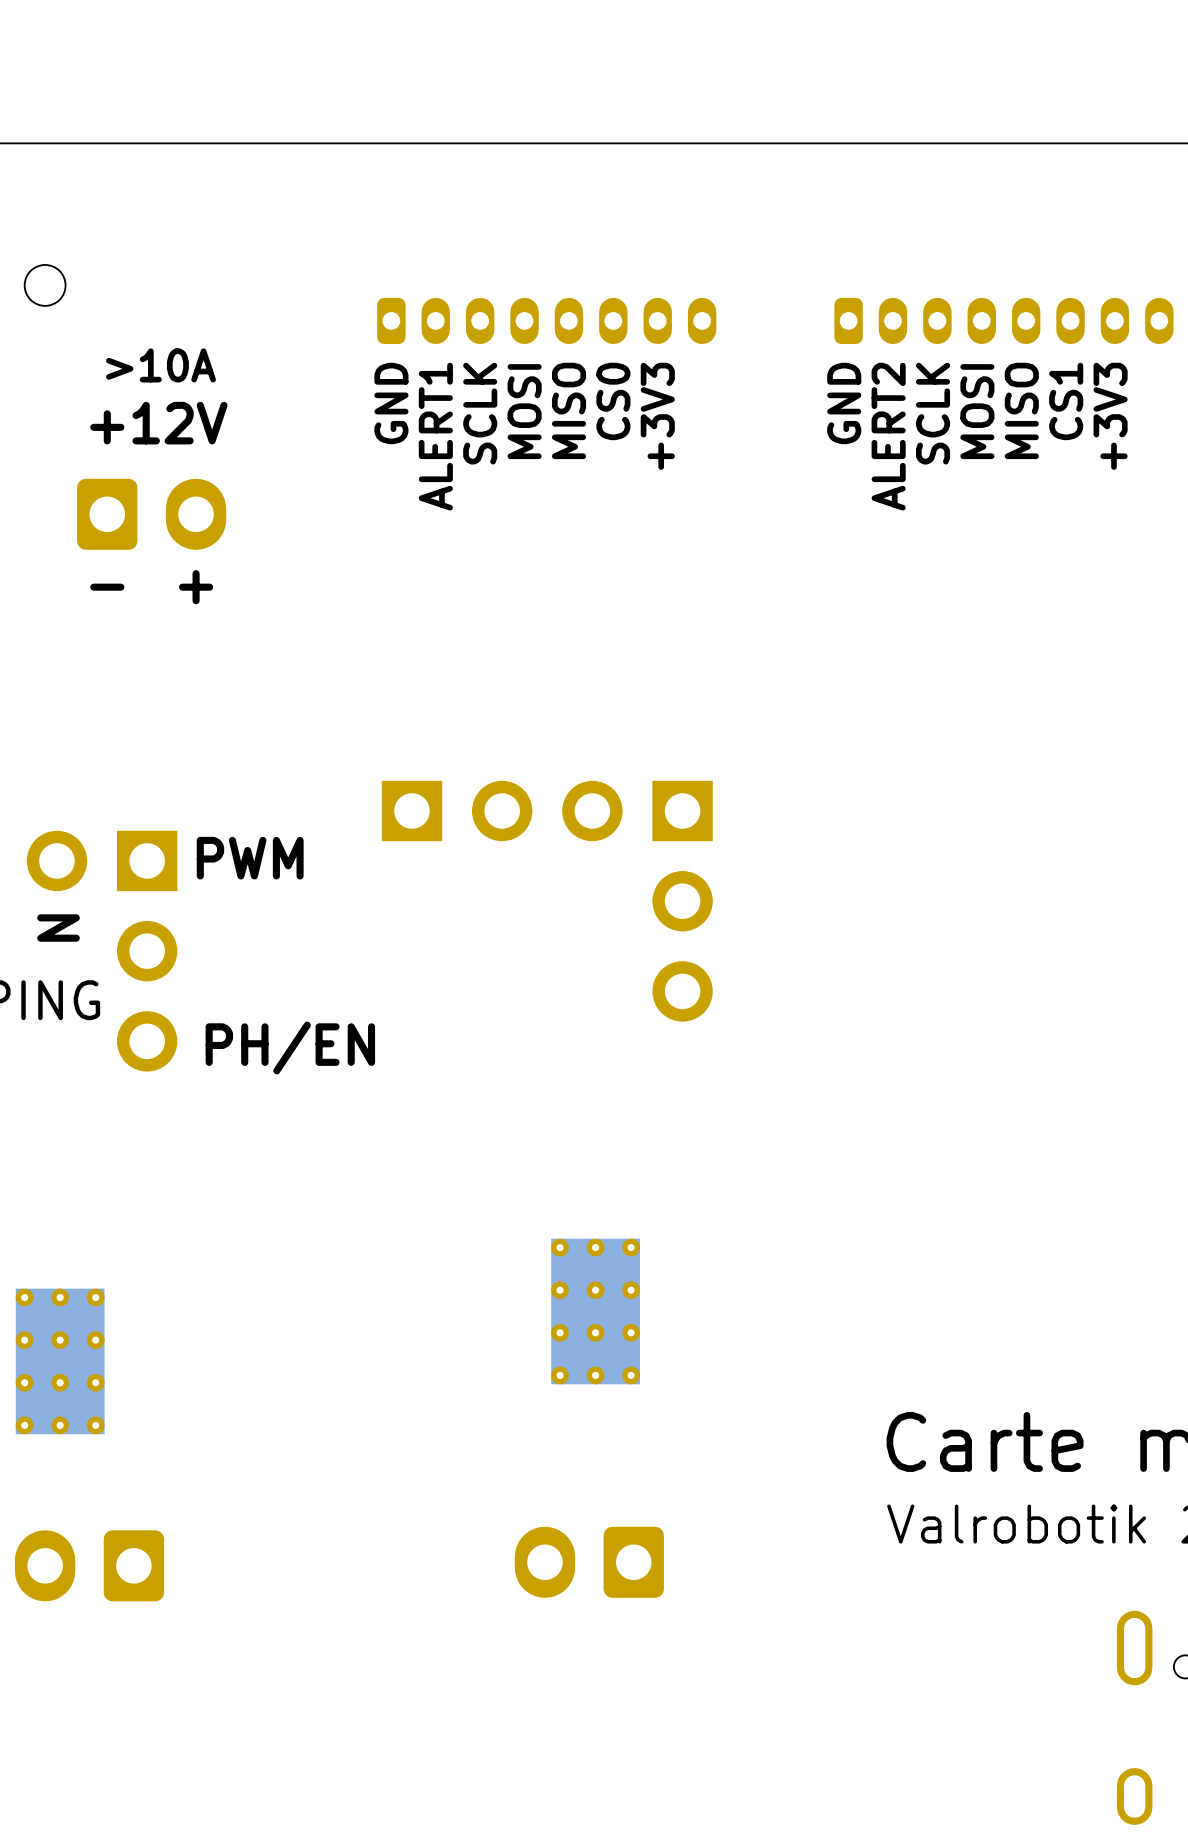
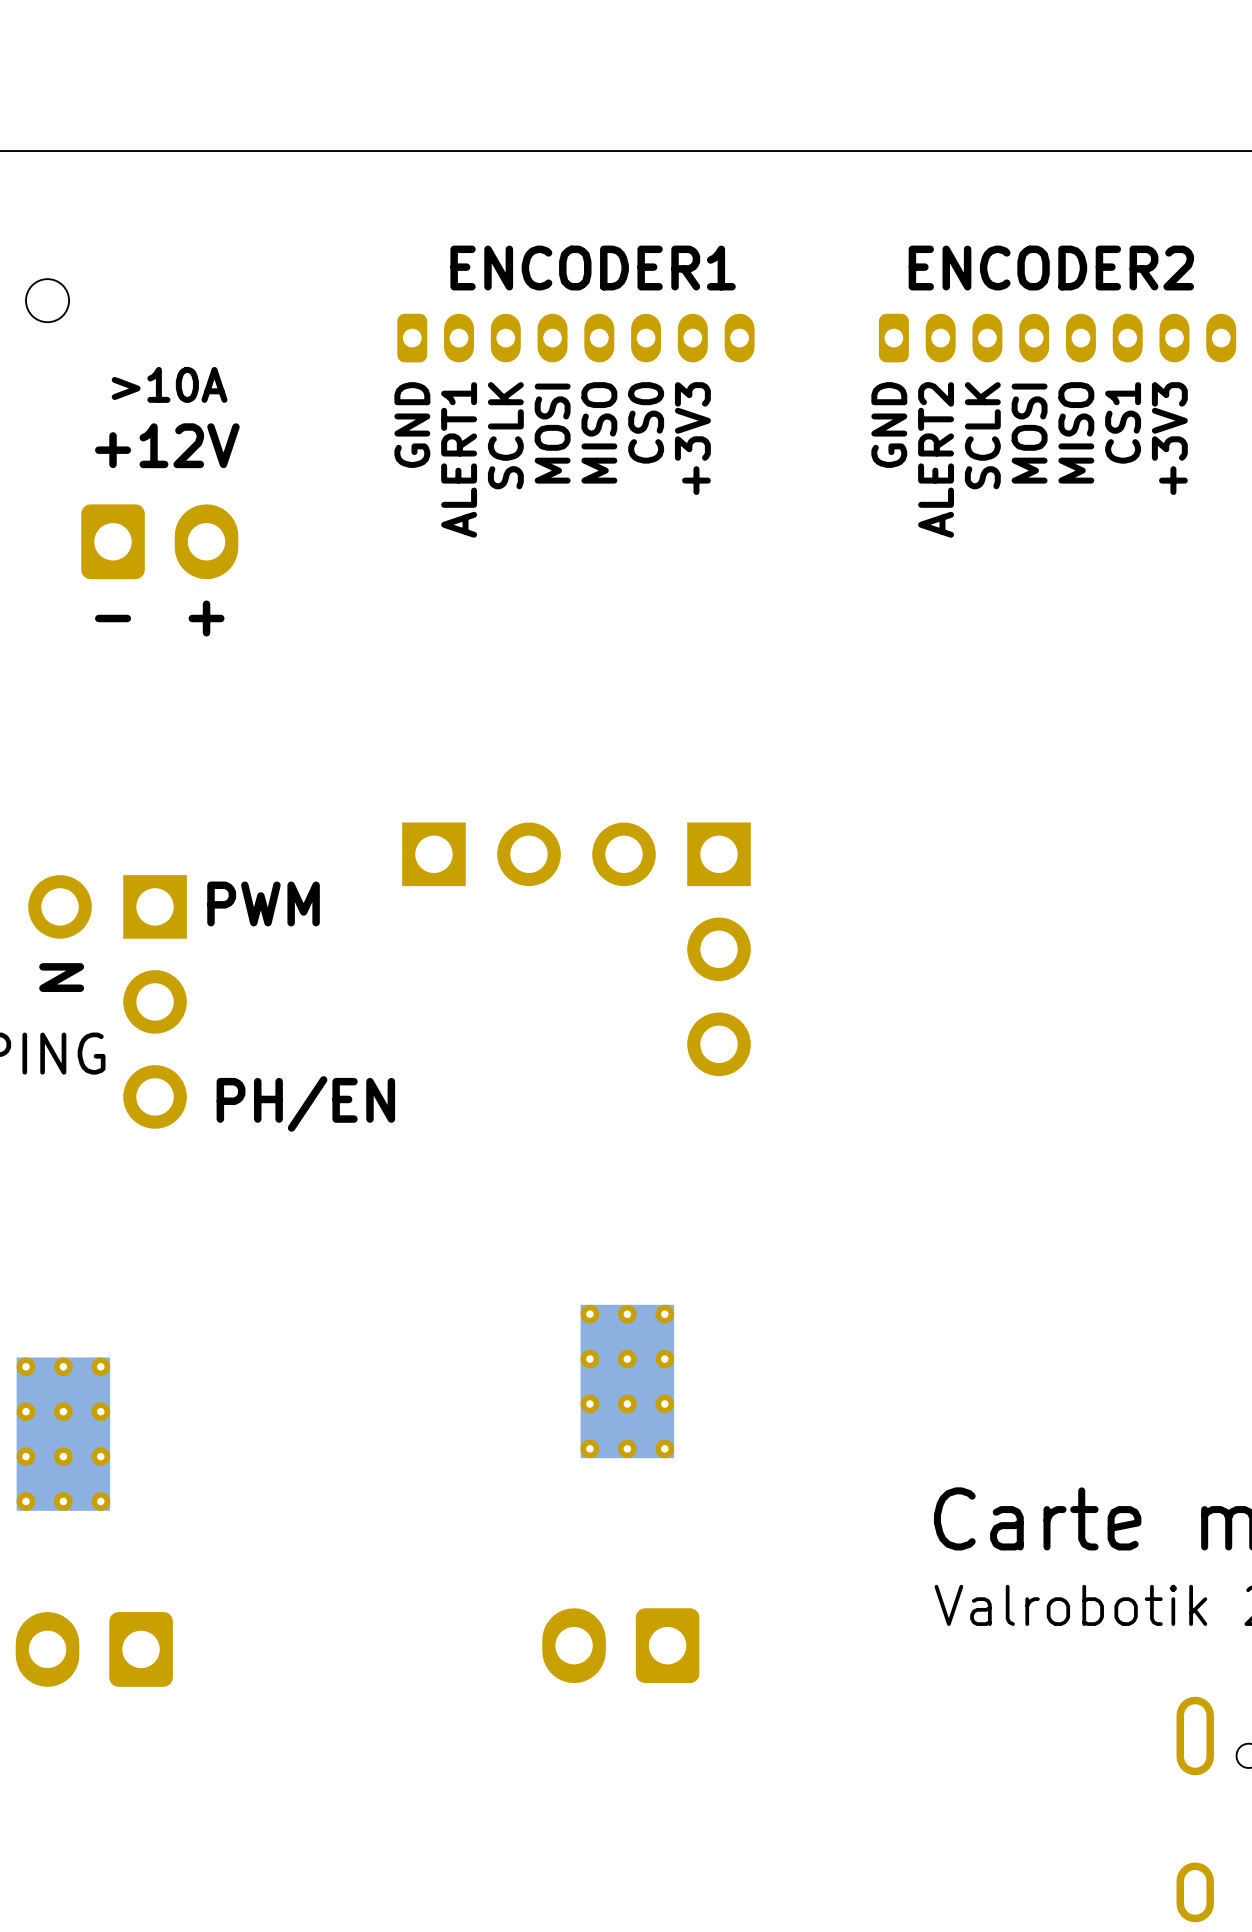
text: none -> ENCODER1 (593, 268)
text: none -> ENCODER2 (1051, 268)

